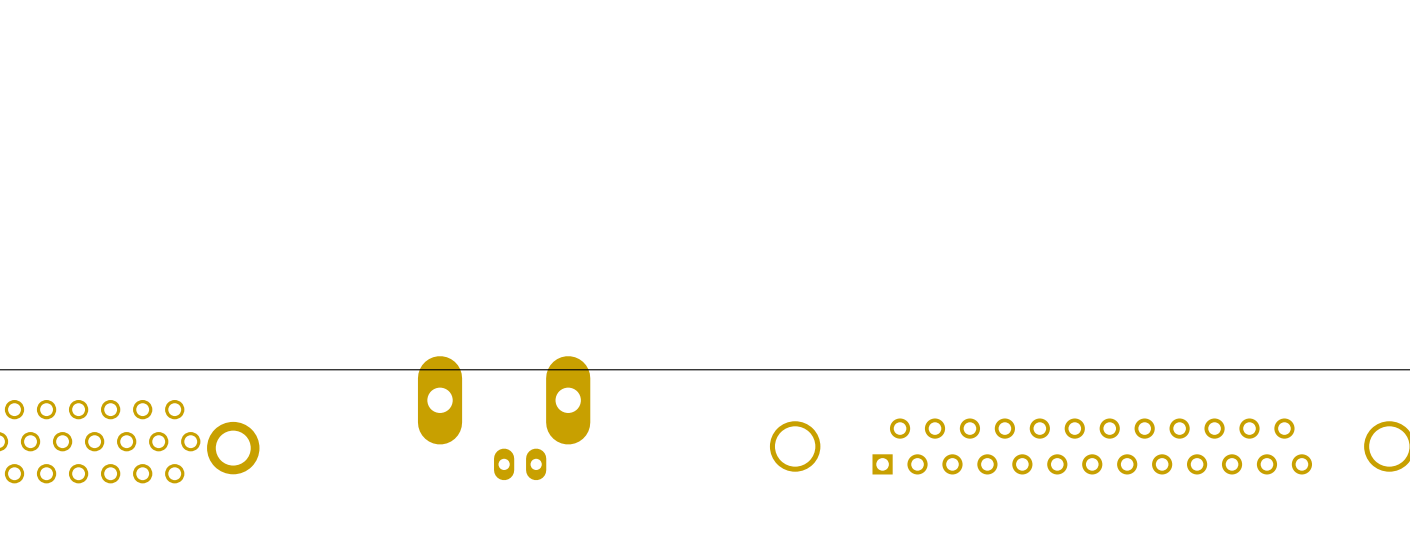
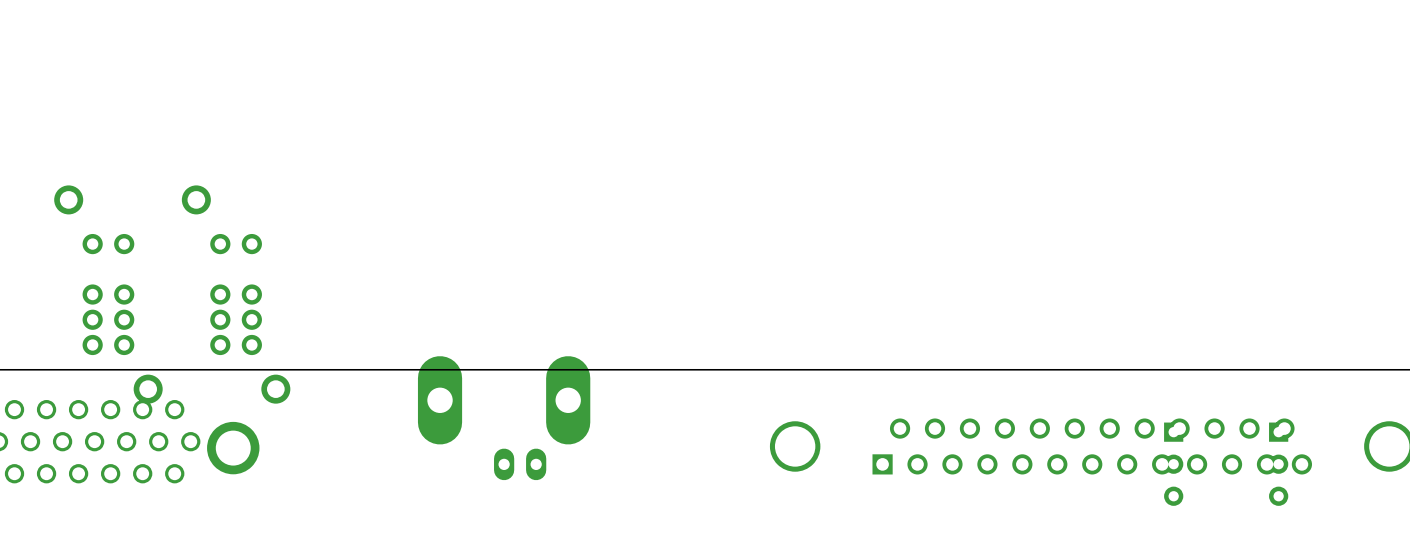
part: none -> (108, 294)
part: none -> (236, 294)
part: none -> (1173, 464)
part: none -> (1278, 464)

